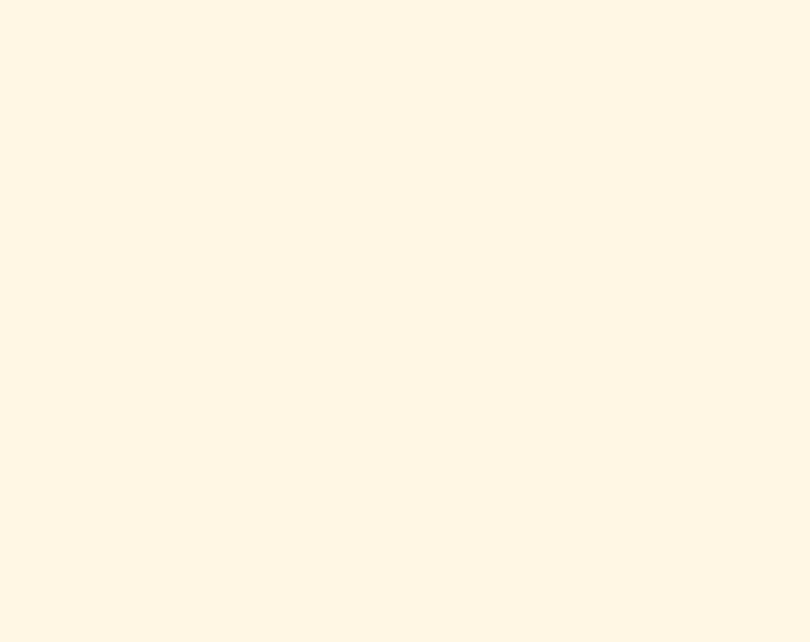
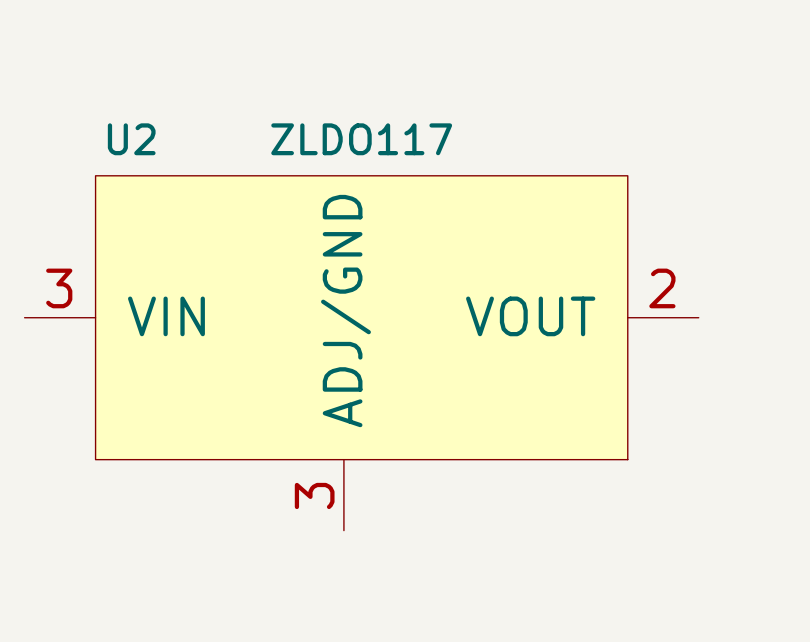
U2: none -> ZLDO117 (361, 353)

